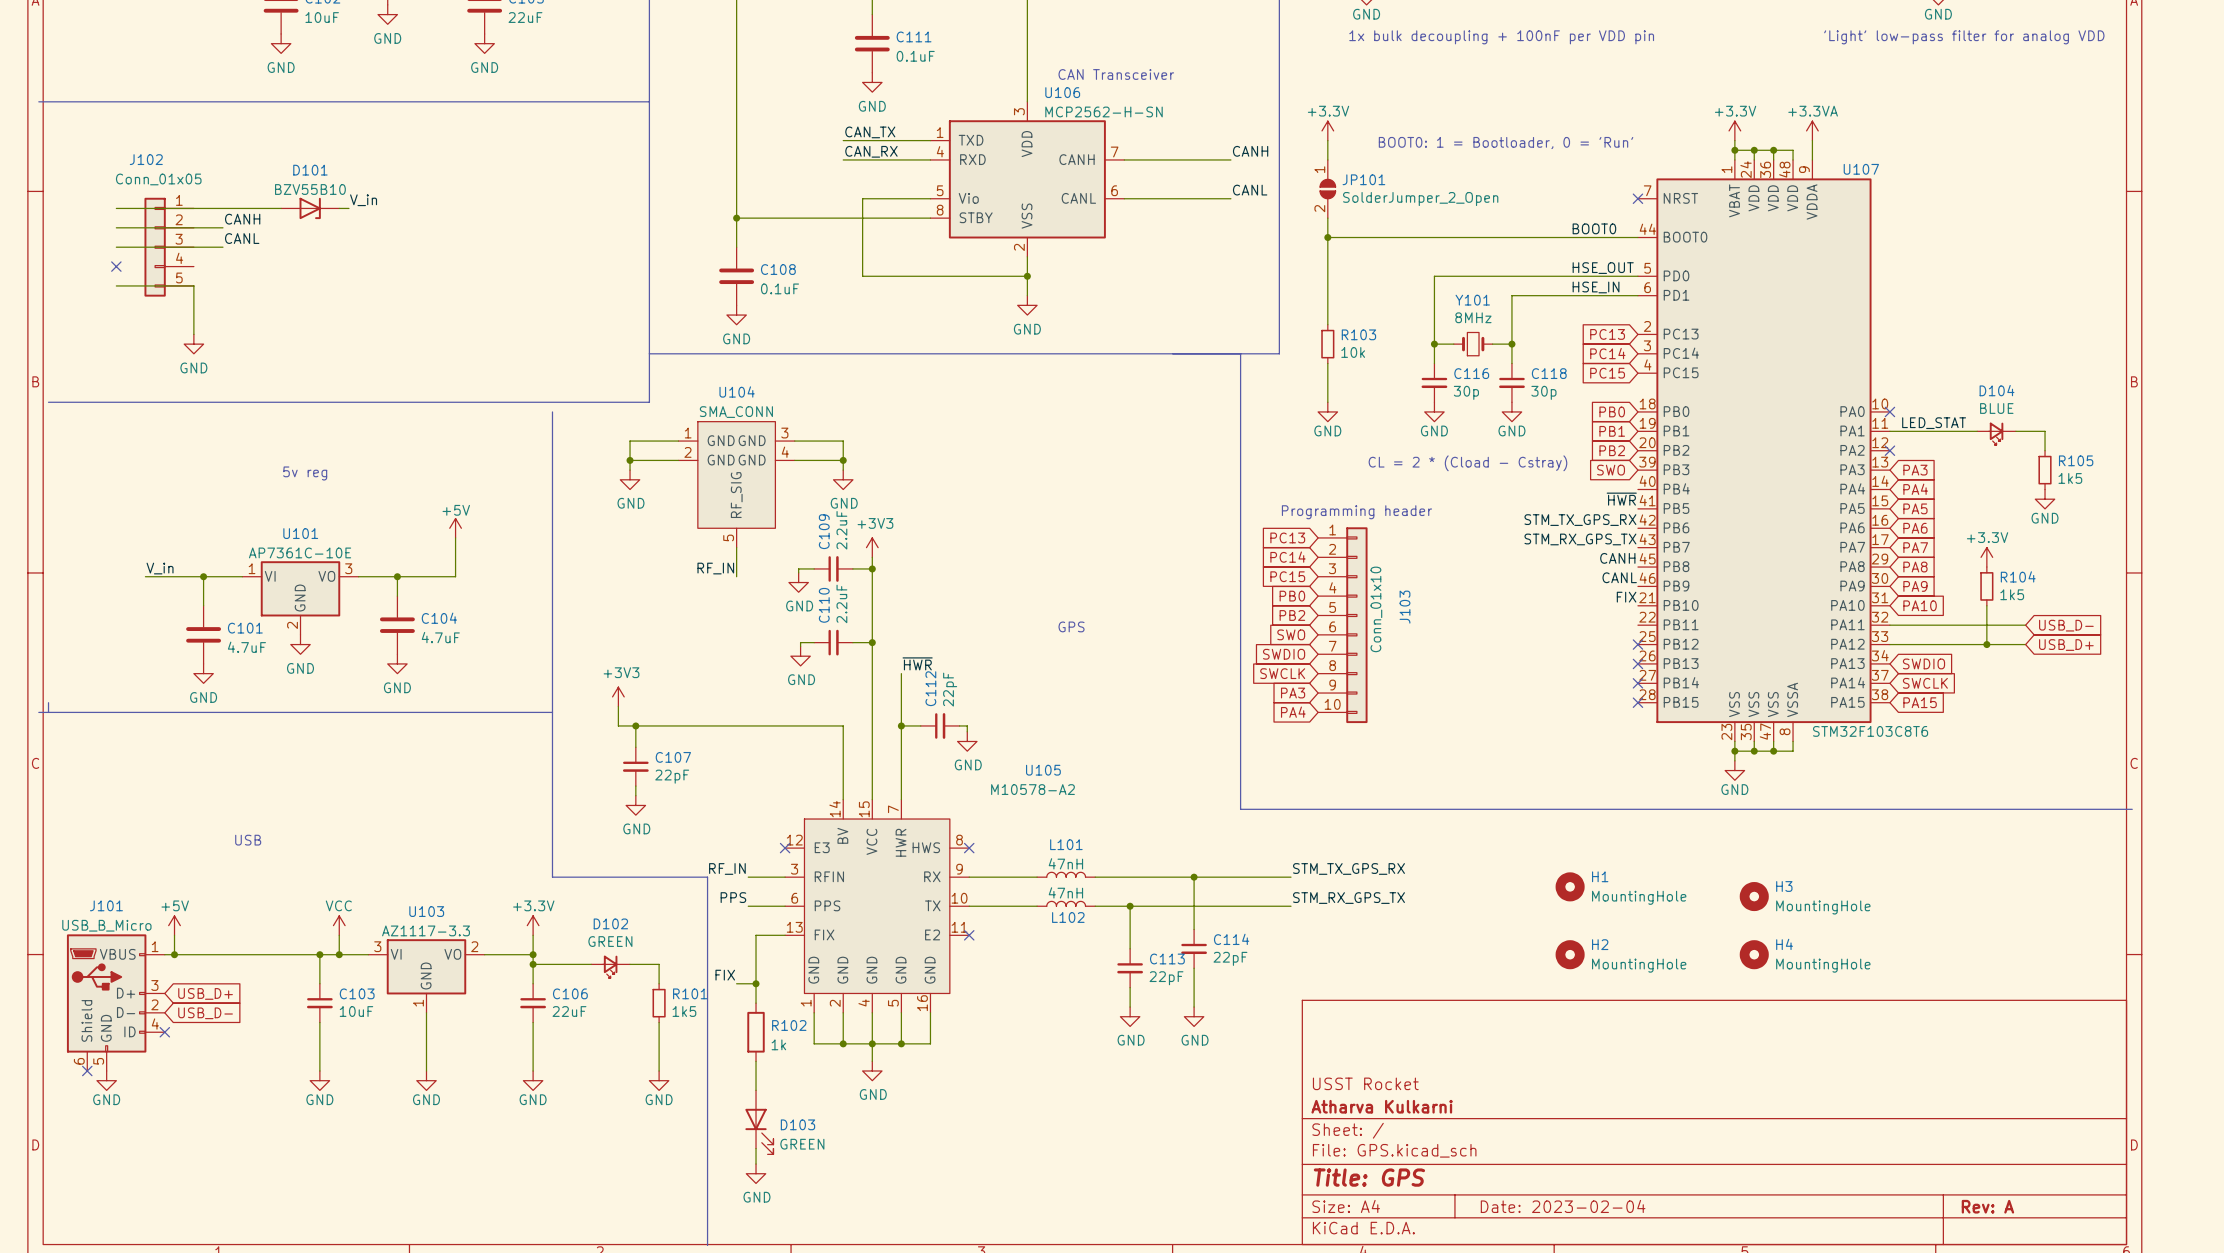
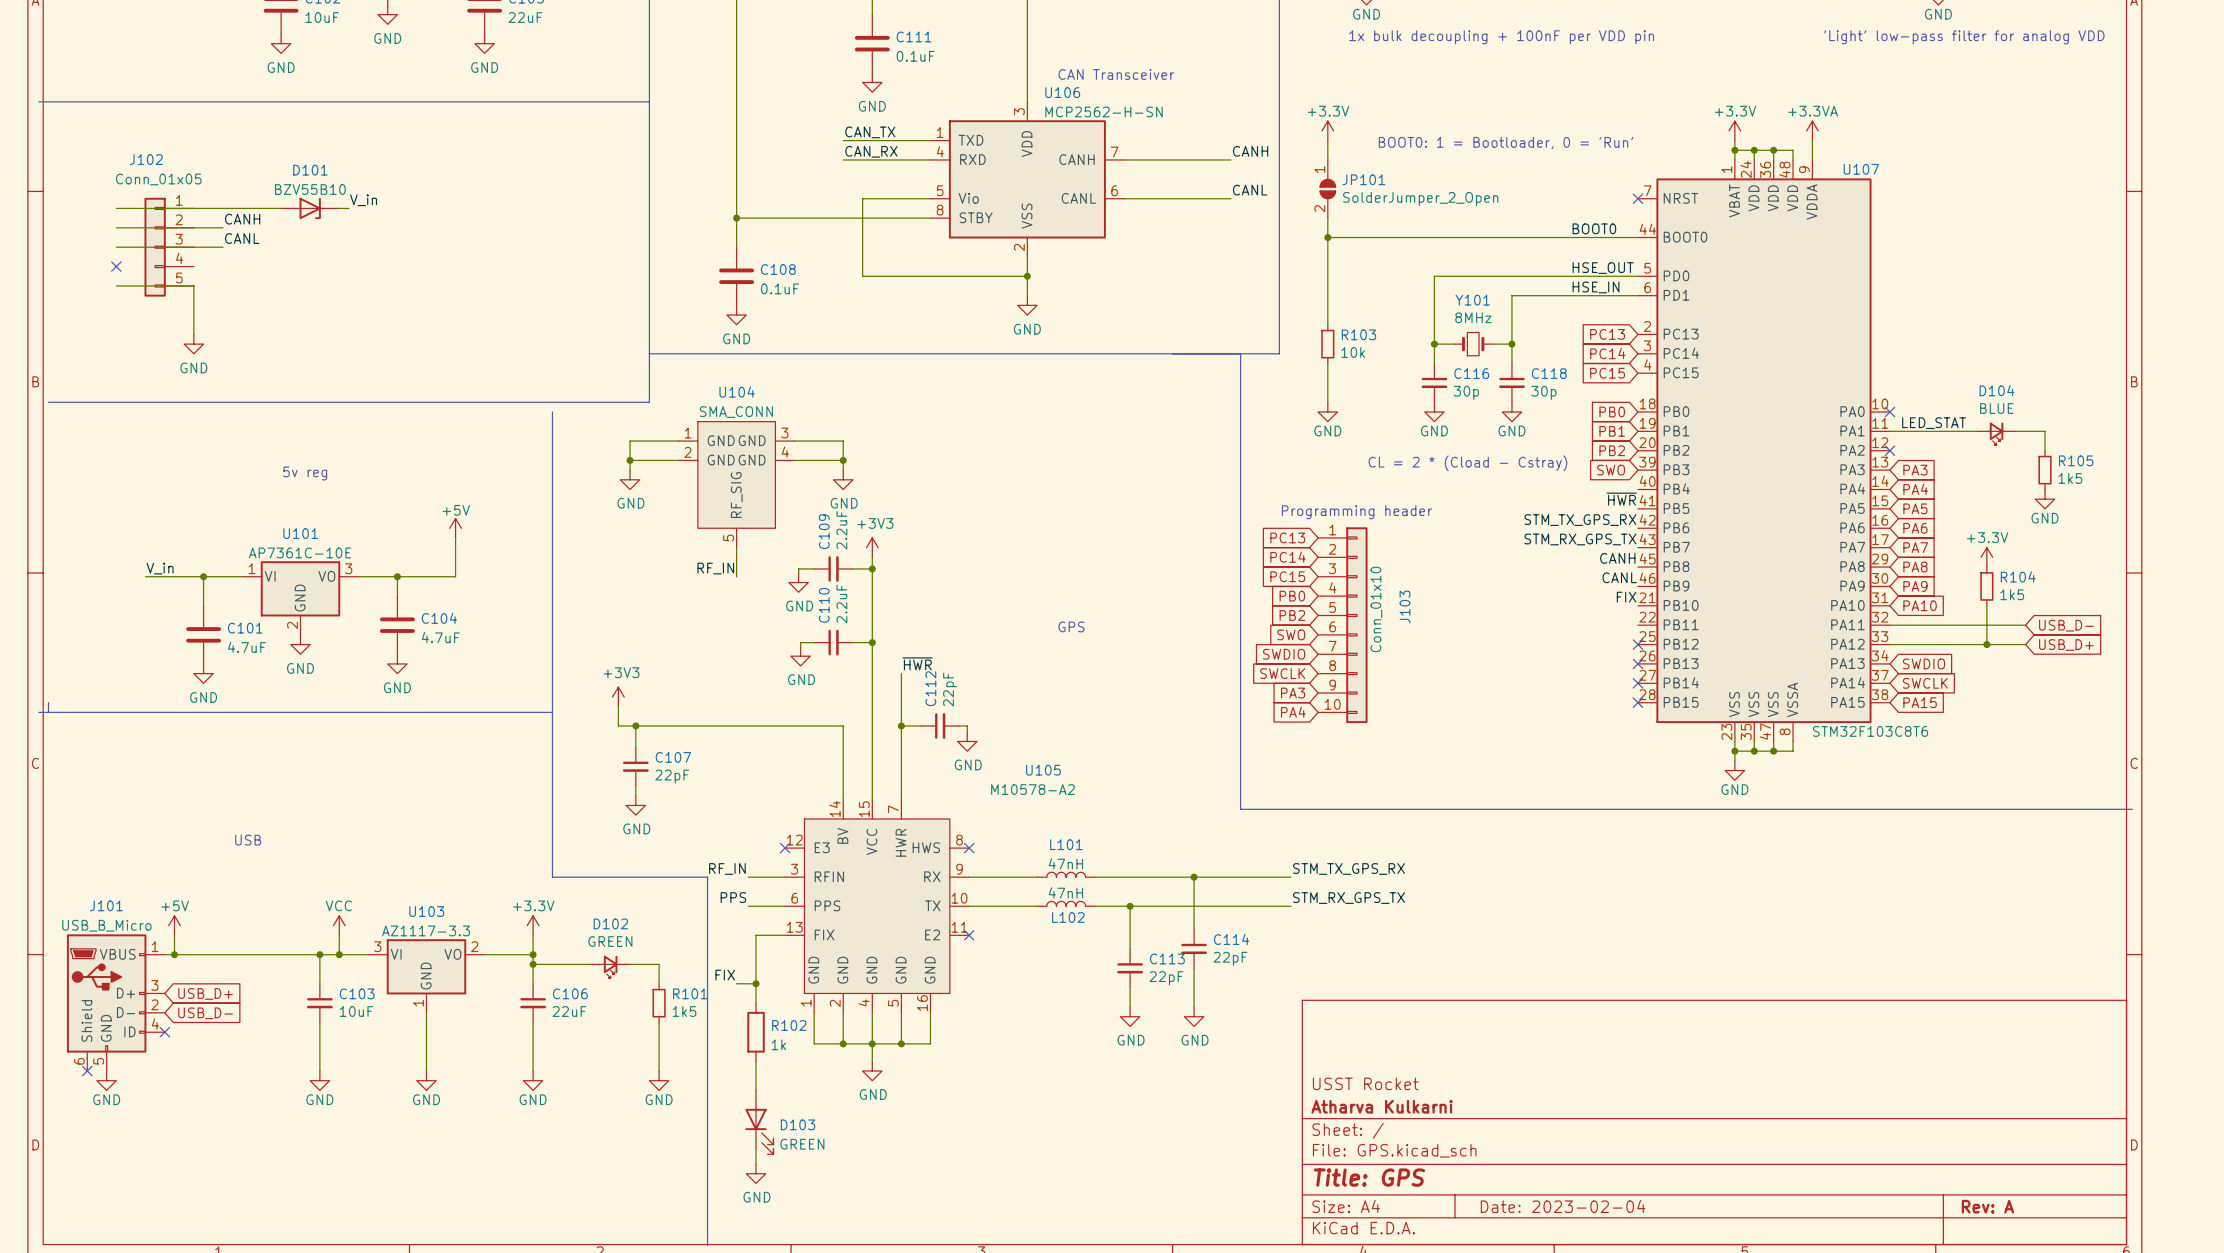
H1: MountingHole (1570, 886) -> none
H3: MountingHole (1754, 896) -> none
H2: MountingHole (1570, 954) -> none
H4: MountingHole (1754, 954) -> none

